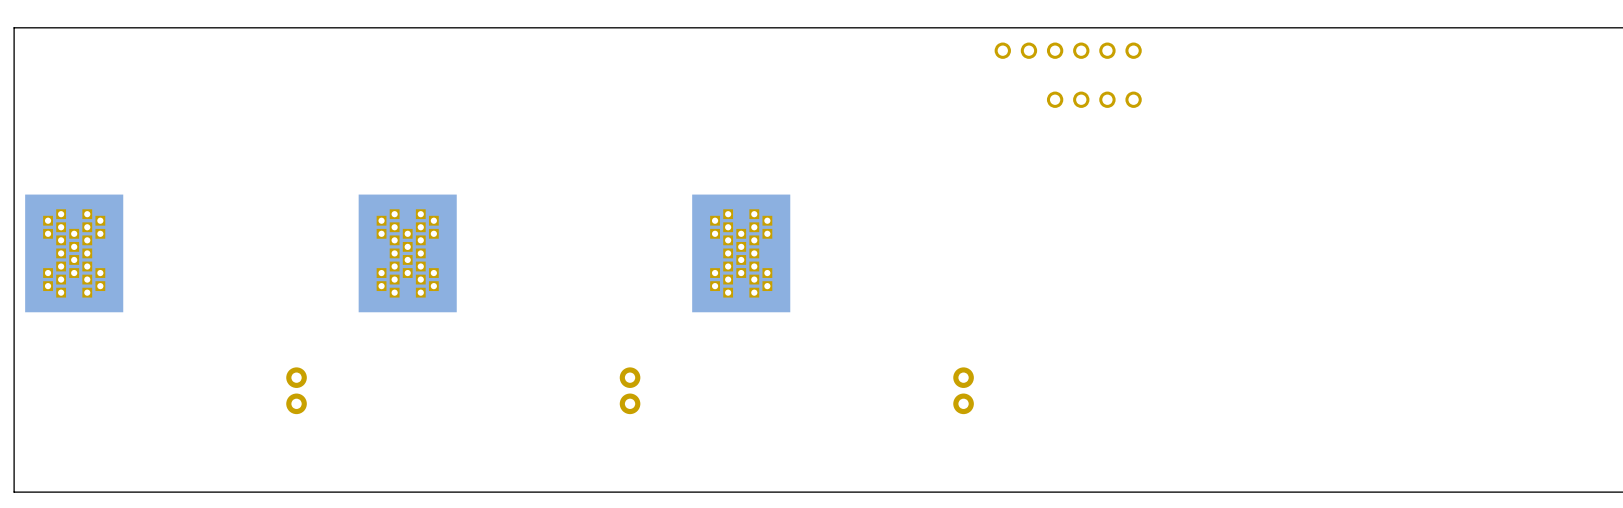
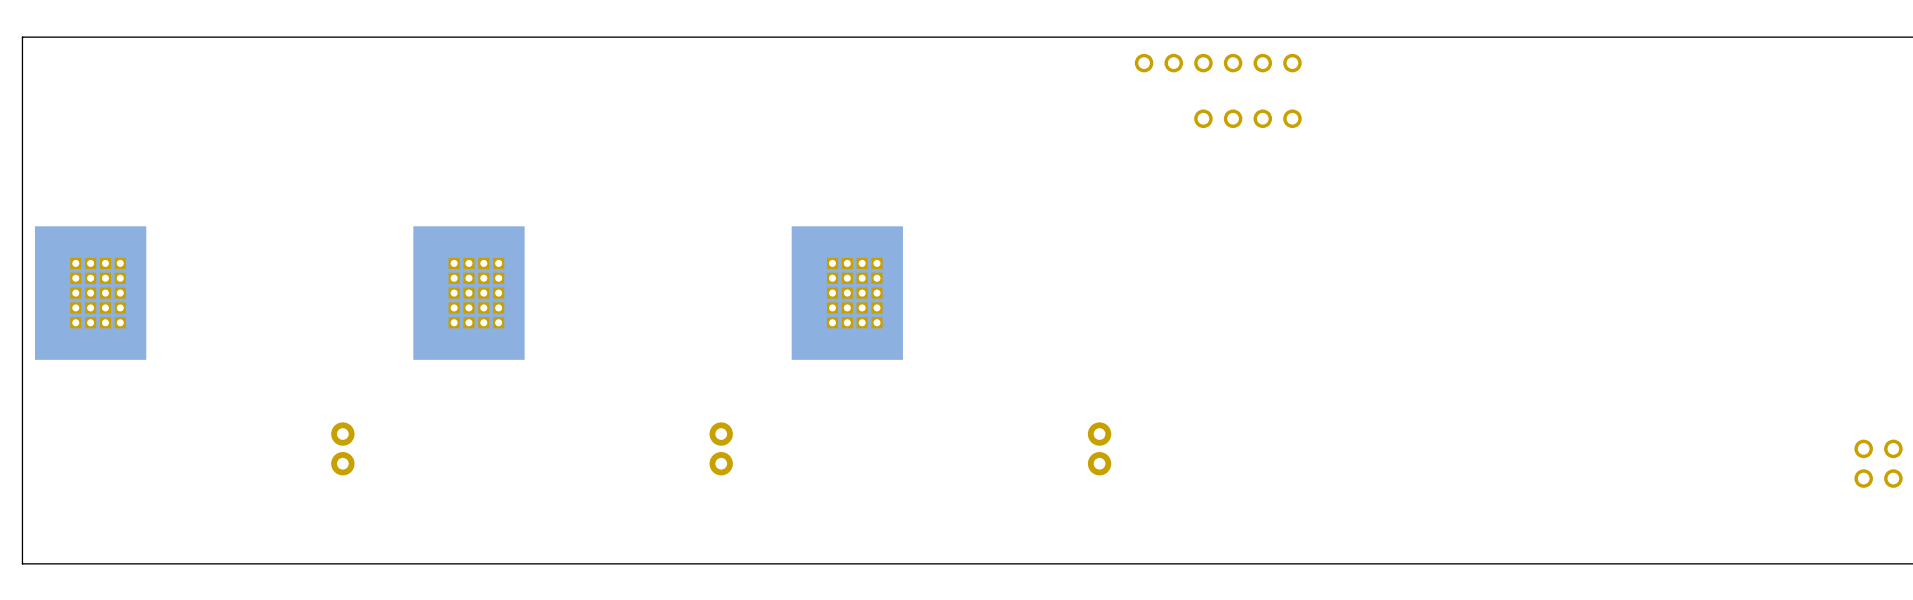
part footprint: [25, 194, 124, 313] -> [34, 226, 147, 360]
part footprint: [358, 194, 457, 313] -> [413, 226, 525, 360]
part footprint: [692, 194, 791, 313] -> [791, 226, 903, 360]

